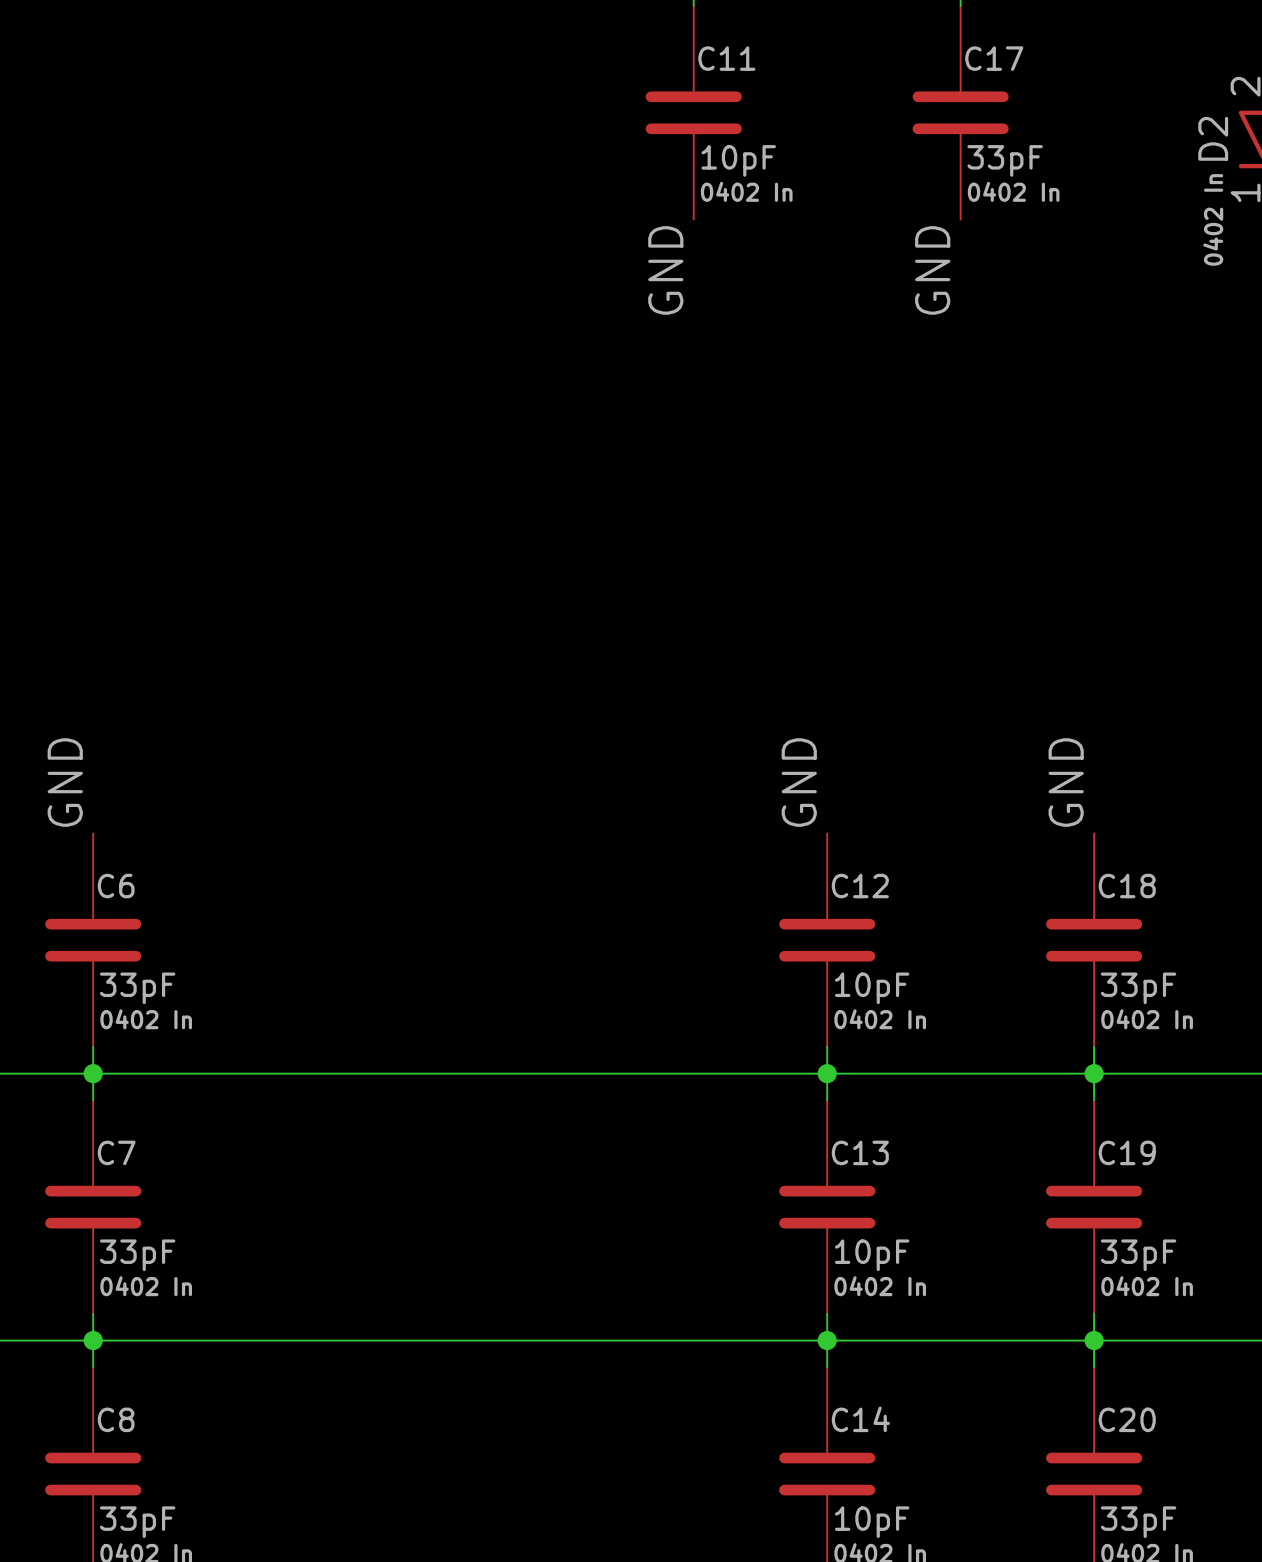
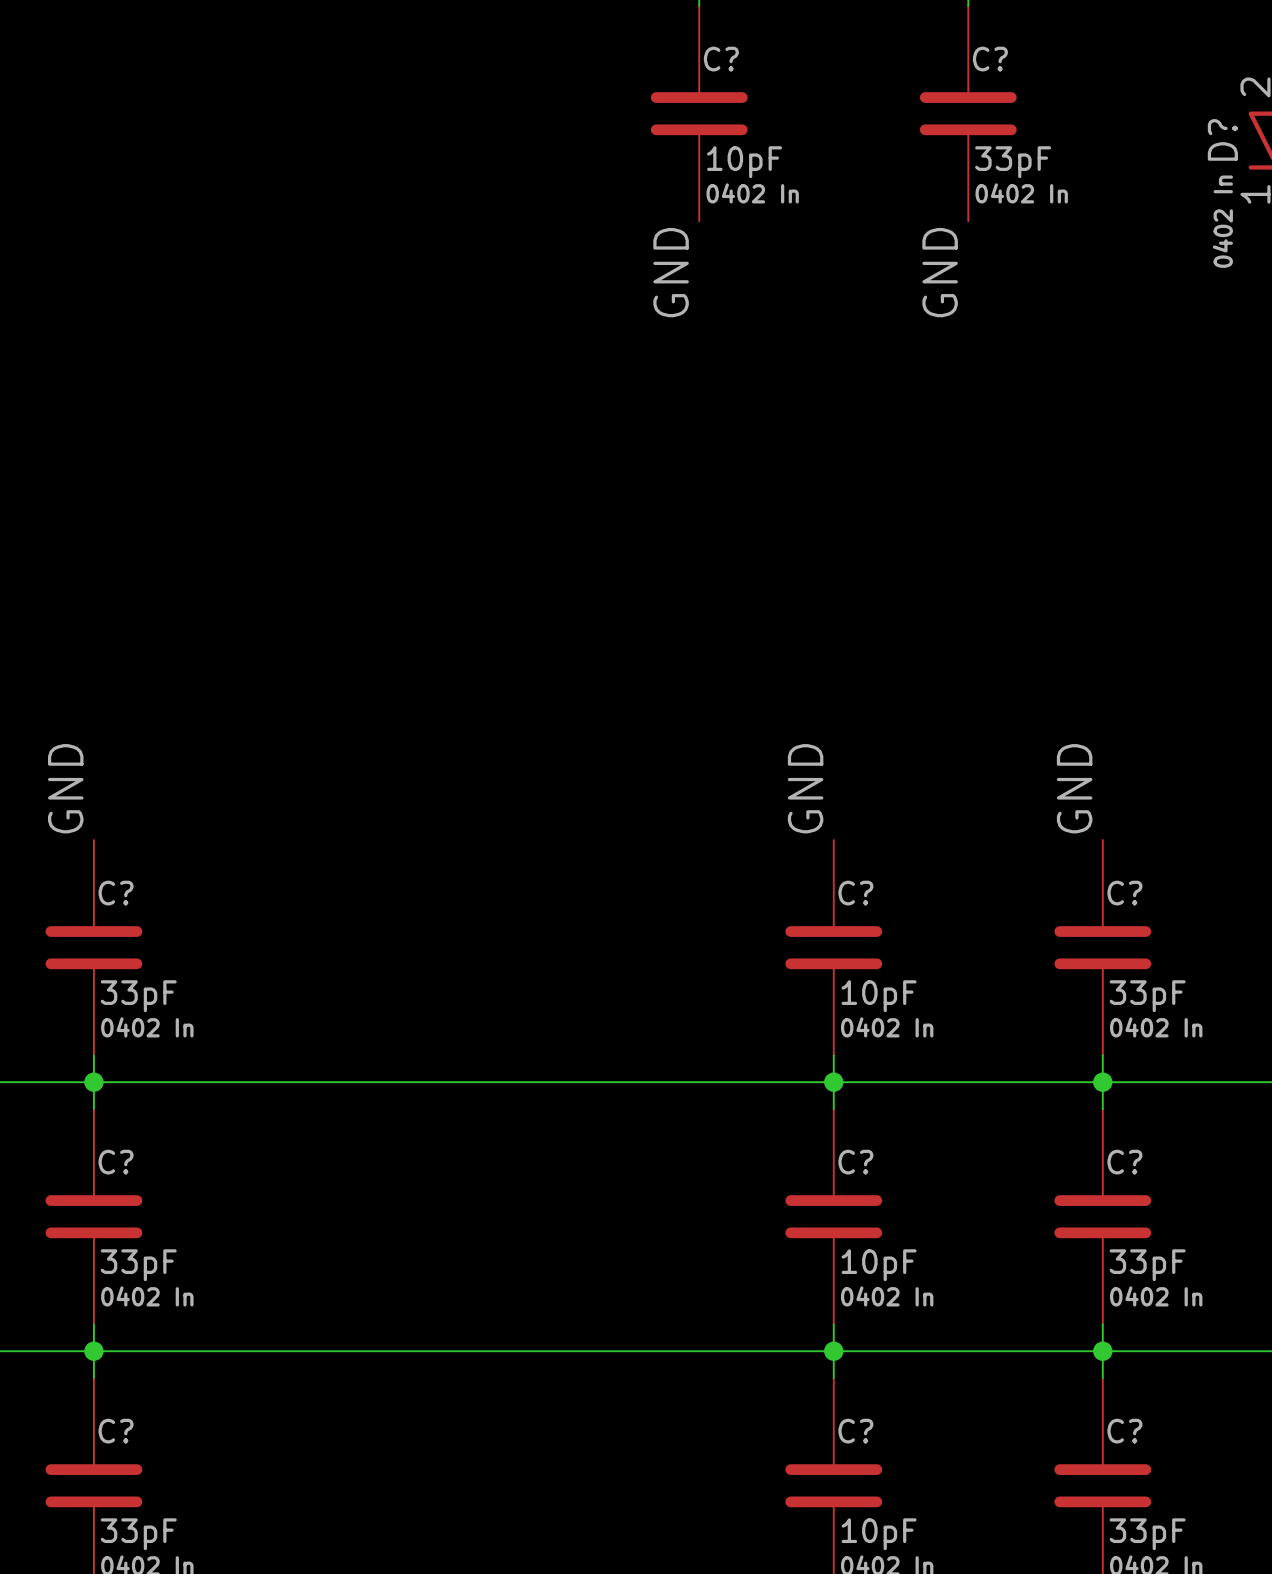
C11 name: C11 (726, 58) -> C? (721, 59)
C17 name: C17 (994, 58) -> C? (990, 59)
D2 name: D2 (1213, 138) -> D? (1222, 139)
C6 name: C6 (116, 886) -> C? (116, 893)
C12 name: C12 (860, 886) -> C? (855, 893)
C18 name: C18 (1127, 886) -> C? (1124, 893)
C7 name: C7 (116, 1152) -> C? (116, 1162)
C13 name: C13 (860, 1152) -> C? (855, 1162)
C19 name: C19 (1127, 1152) -> C? (1124, 1162)
C8 name: C8 (116, 1419) -> C? (116, 1431)
C14 name: C14 (860, 1419) -> C? (855, 1431)
C20 name: C20 (1127, 1419) -> C? (1124, 1431)

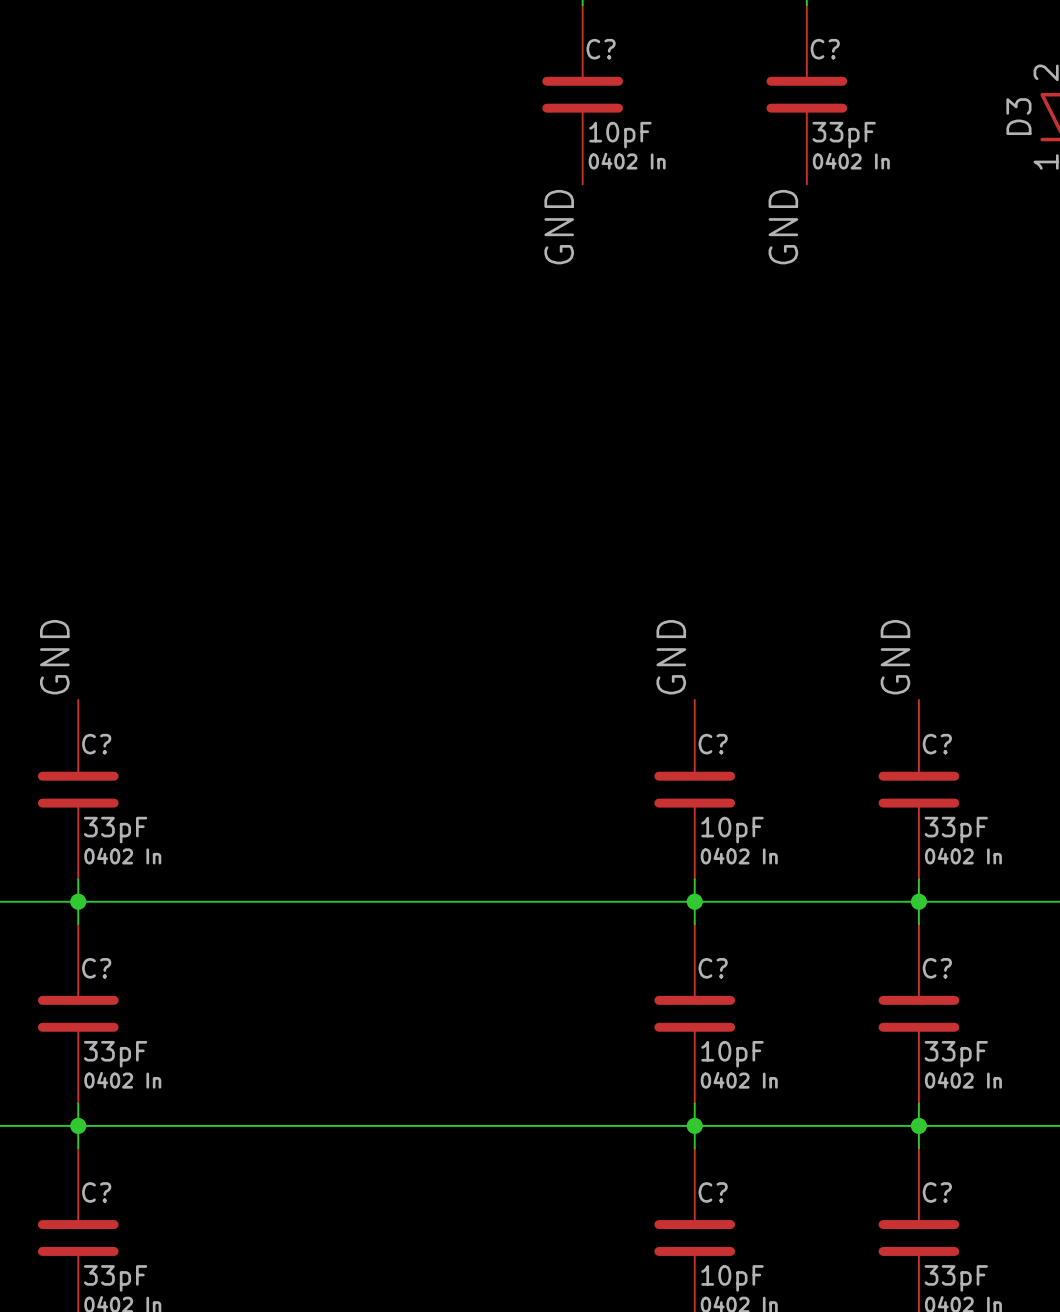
D? name: D? (1222, 139) -> D3 (1018, 116)
D? text: 0402 In (1222, 221) -> none

